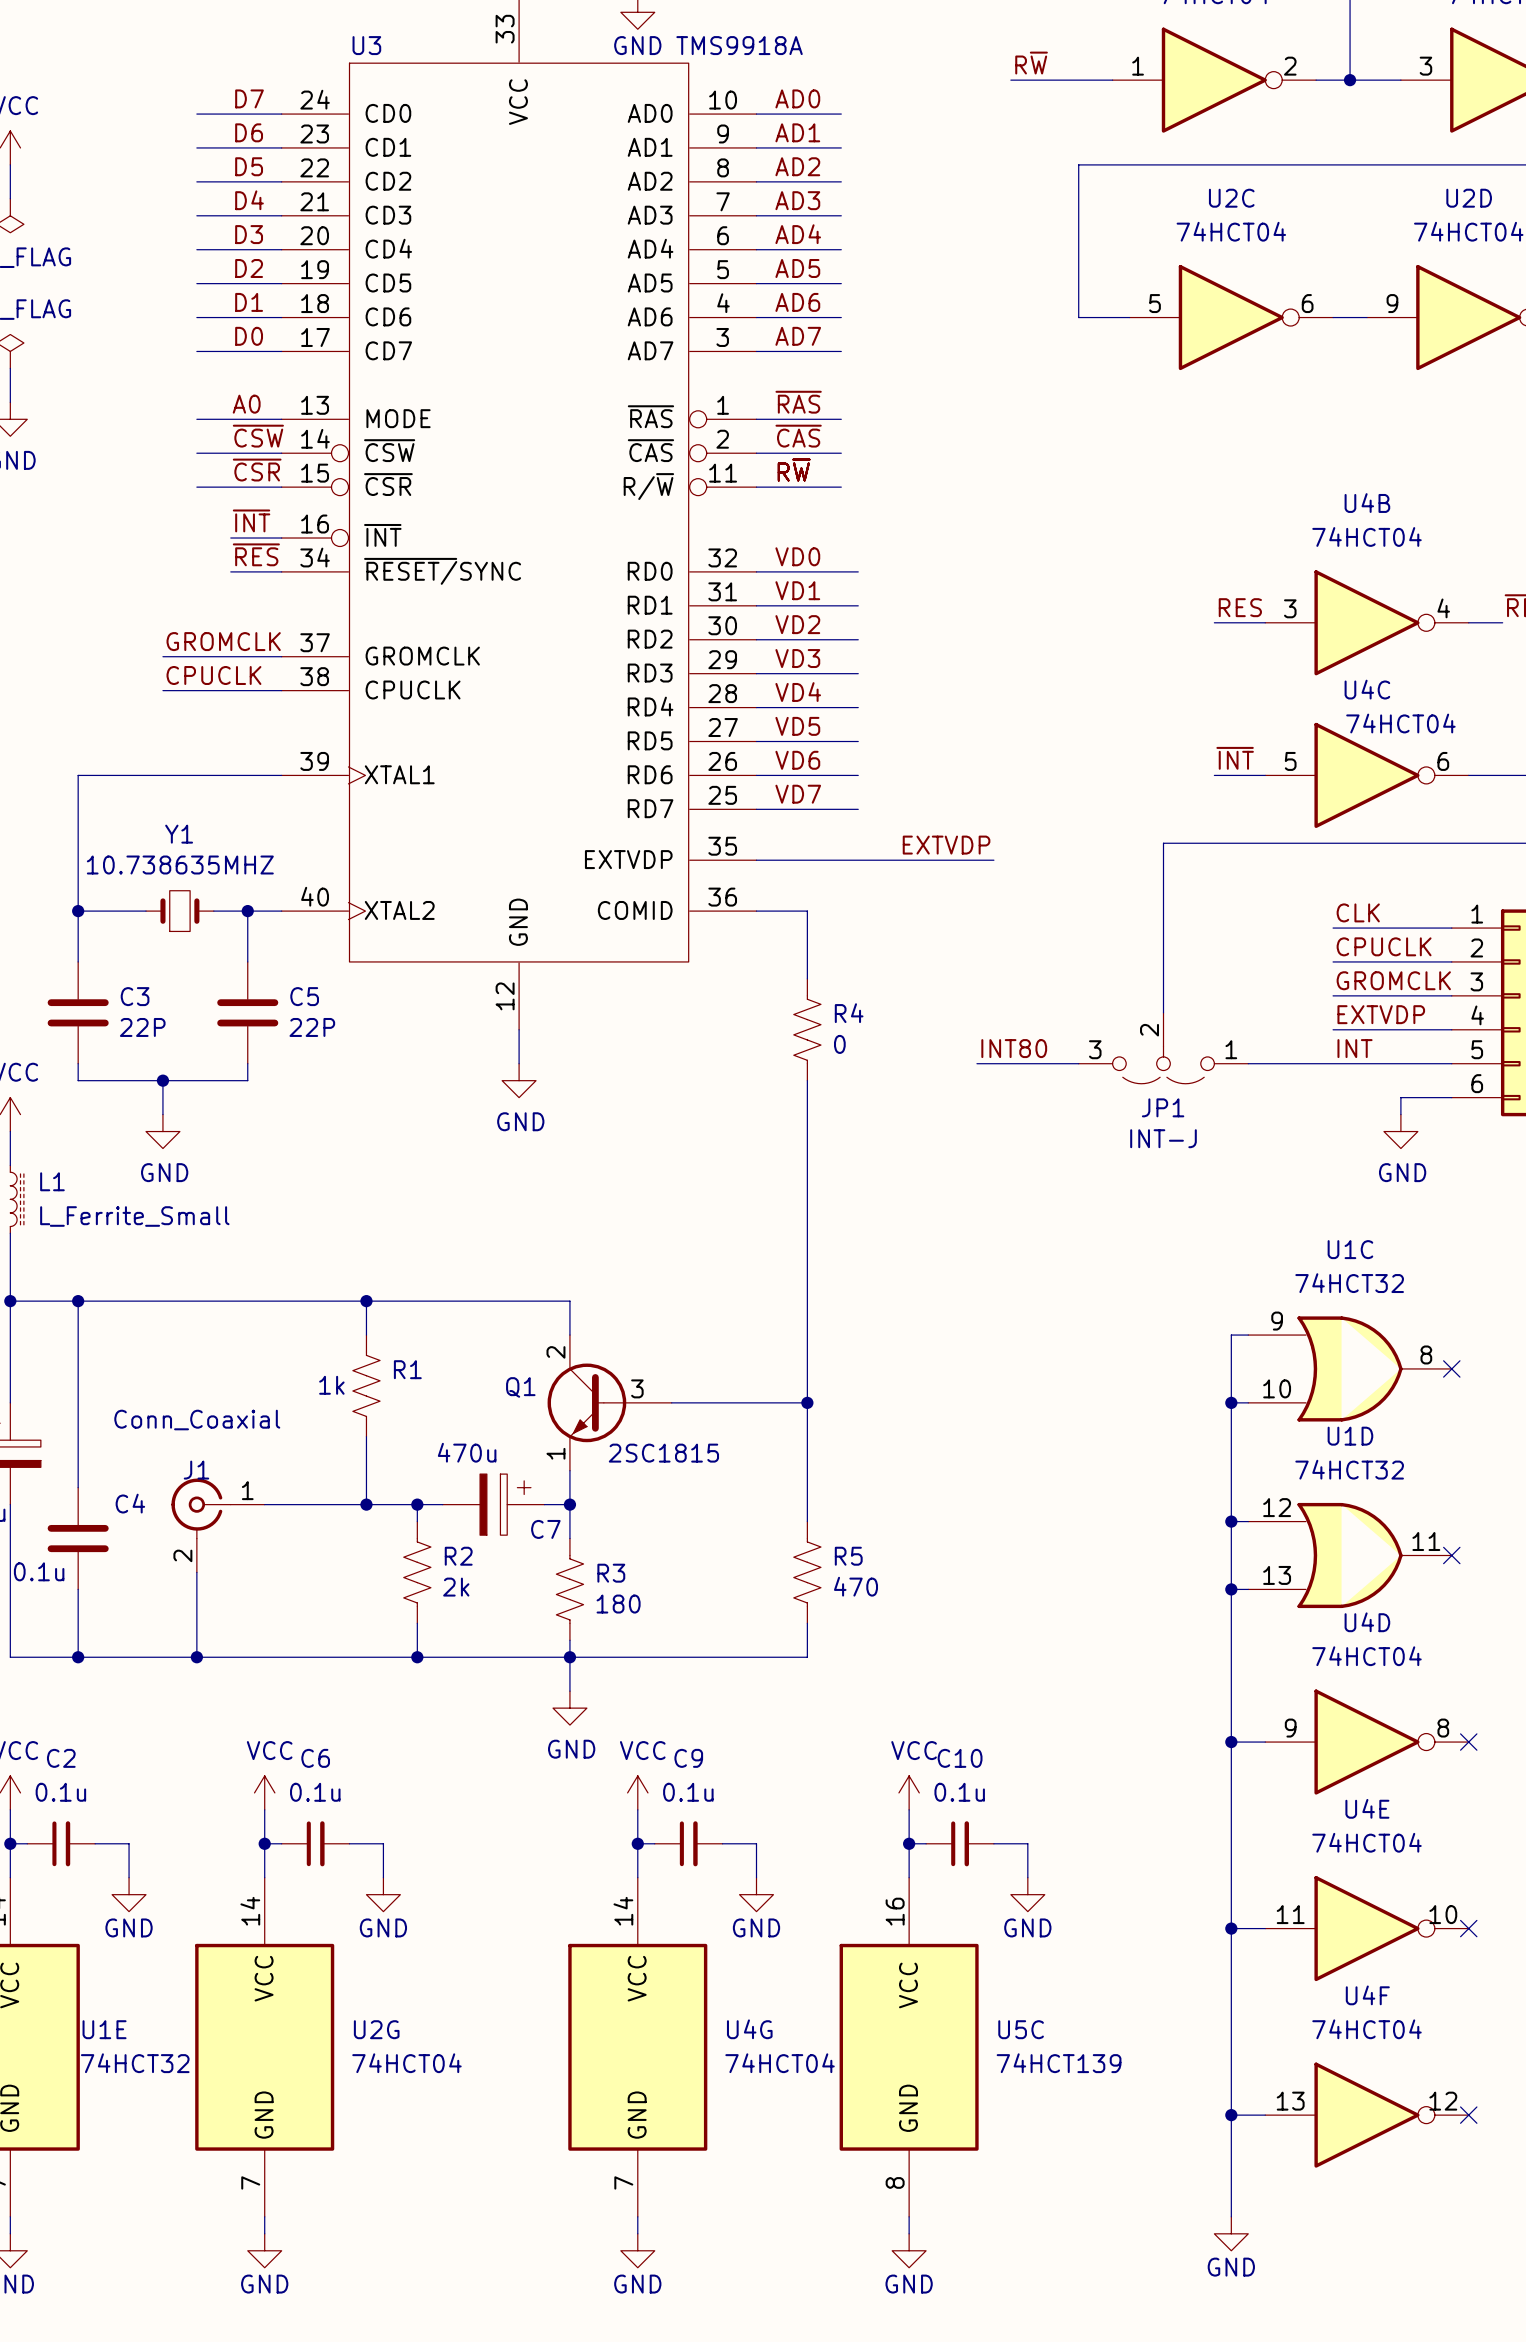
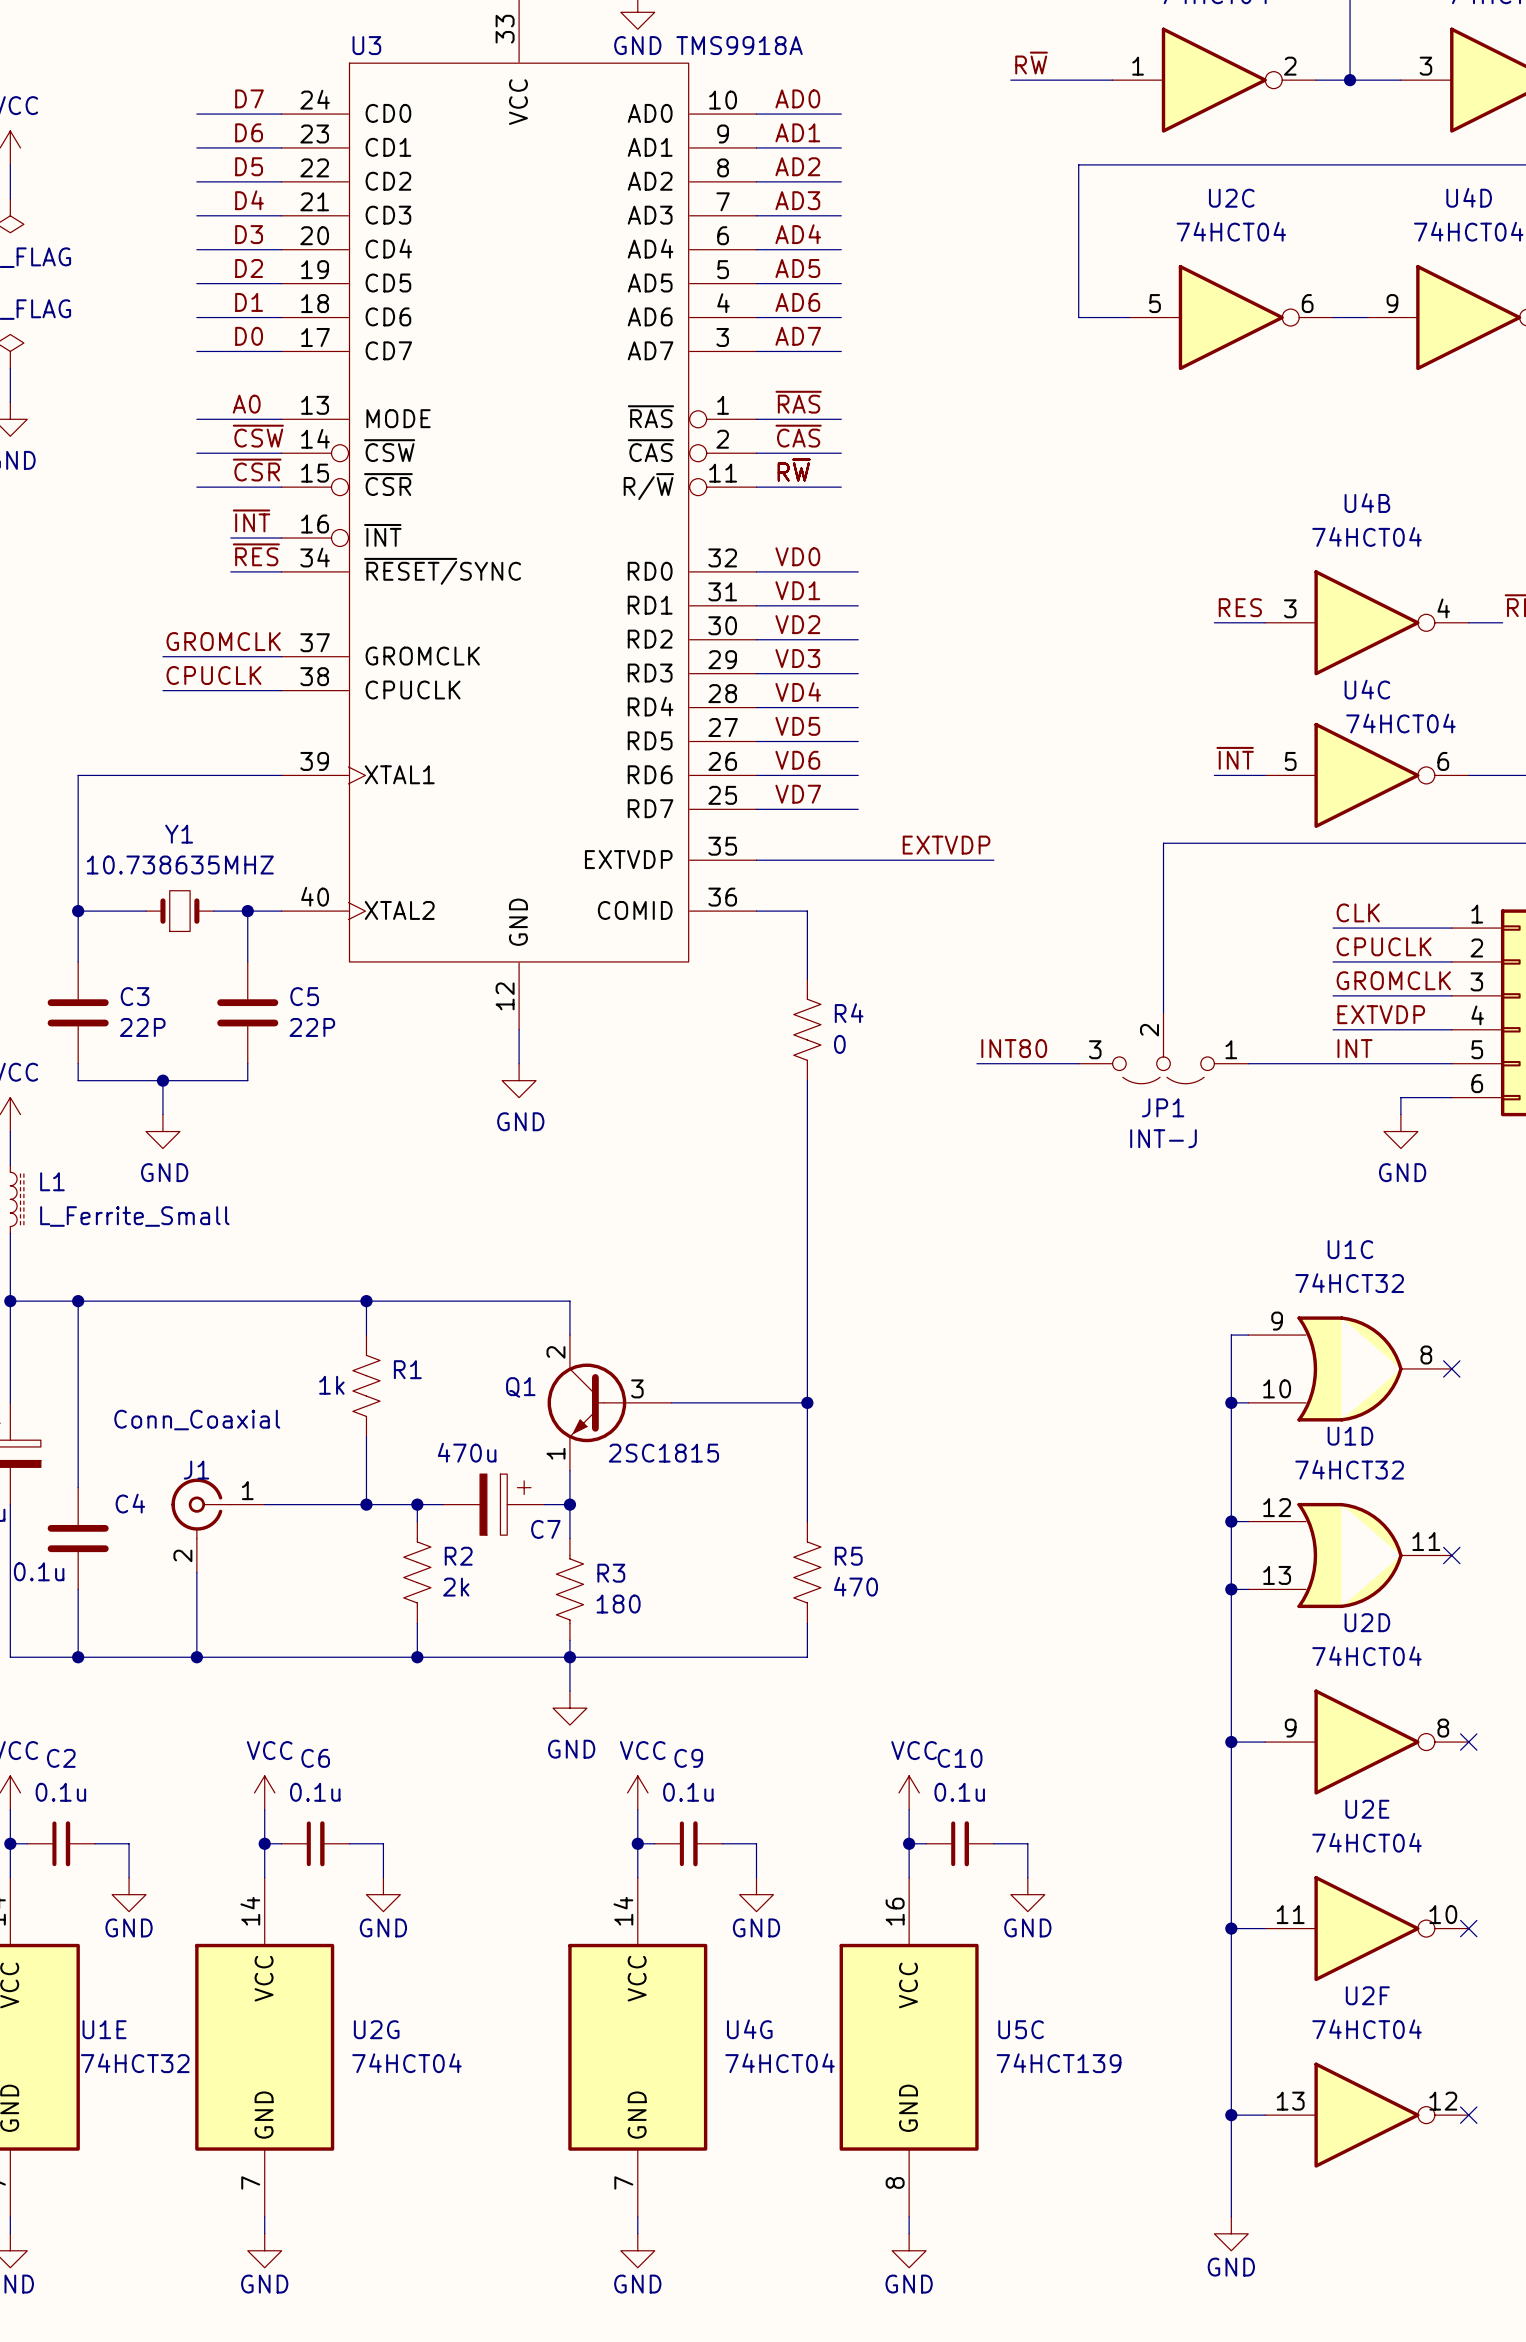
U2D name: U2D (1469, 198) -> U4D (1469, 197)
U4D name: U4D (1367, 1622) -> U2D (1367, 1622)
U4E name: U4E (1367, 1808) -> U2E (1367, 1809)
U4F name: U4F (1367, 1995) -> U2F (1367, 1995)

